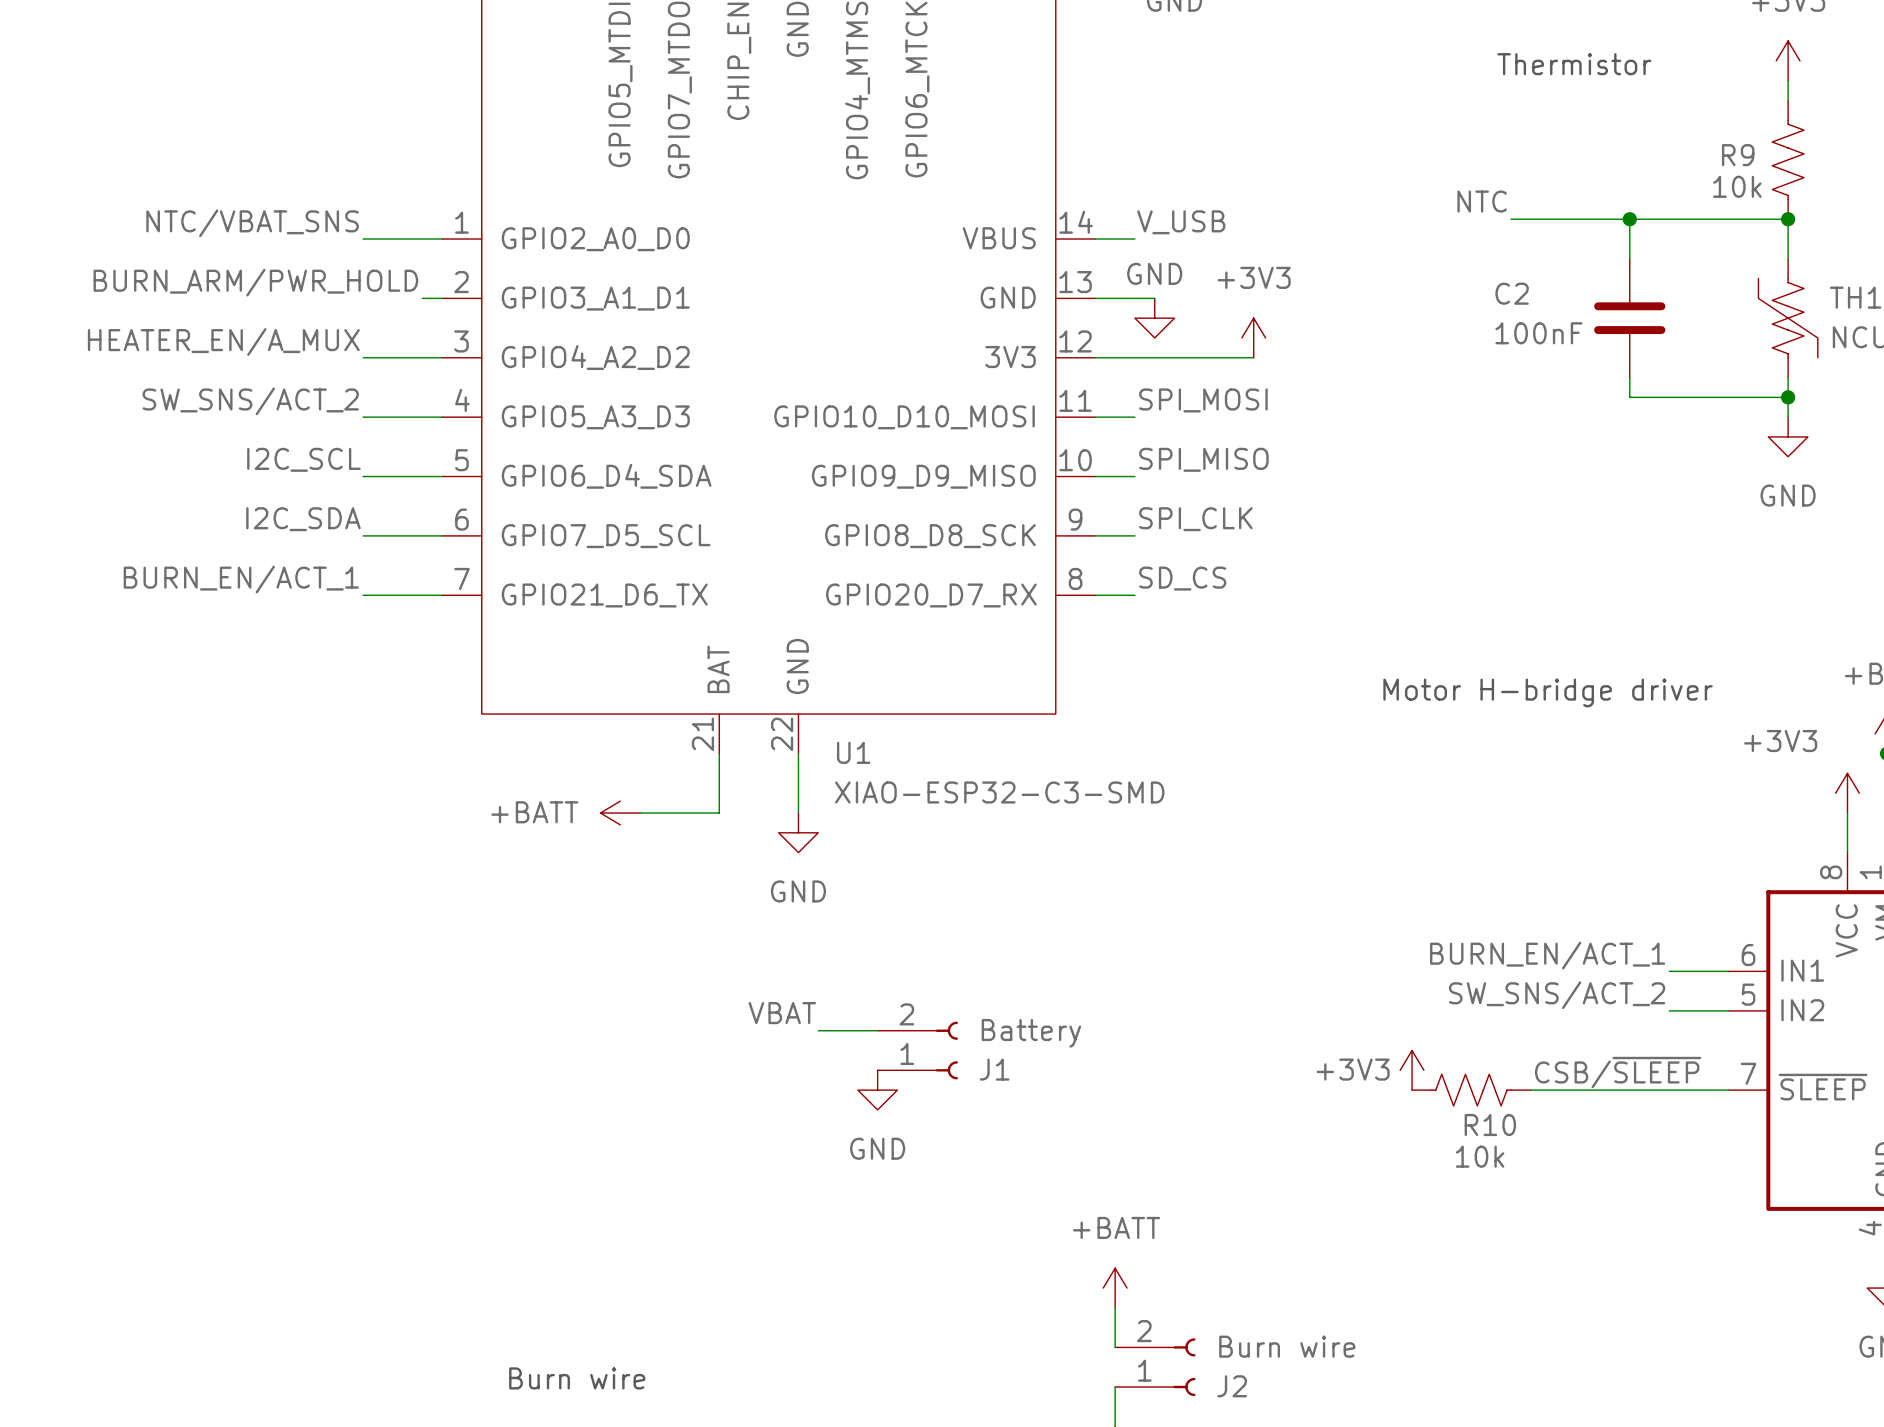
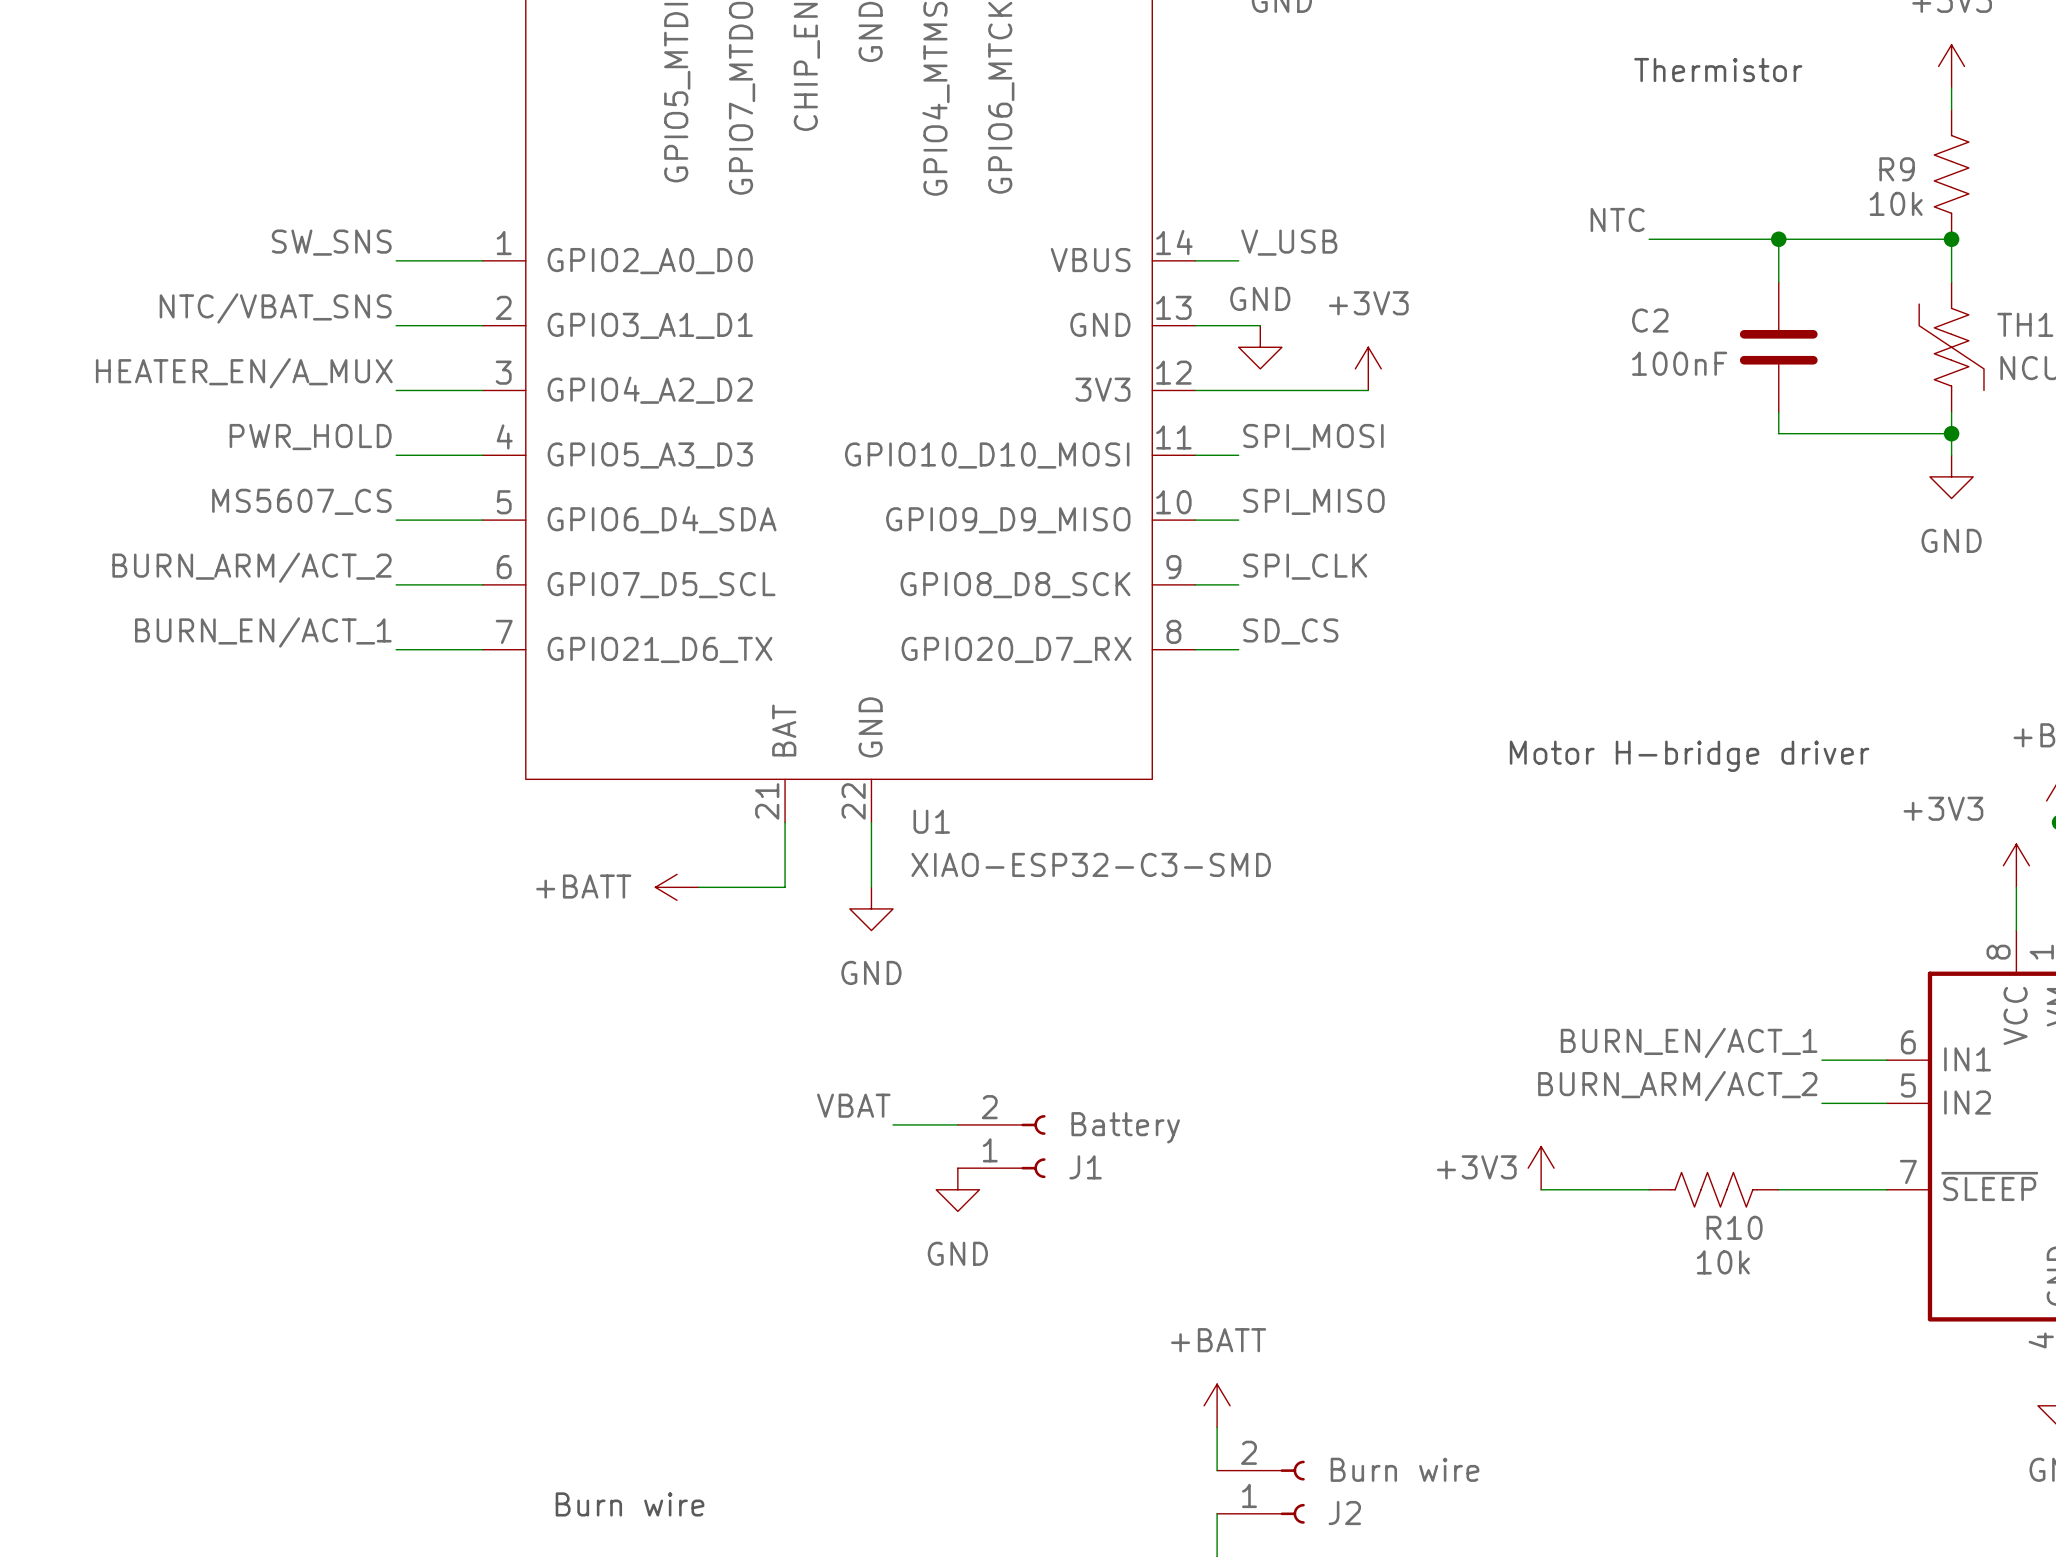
label: NTC/VBAT_SNS (252, 223) -> SW_SNS (331, 242)
label: none -> NTC/VBAT_SNS (275, 308)
label: BURN_ARM/PWR_HOLD (255, 282) -> none
wire: none -> (396, 325) (461, 325)
label: SW_SNS/ACT_2 (250, 401) -> PWR_HOLD (310, 437)
label: I2C_SCL (303, 459) -> MS5607_CS (301, 501)
label: I2C_SDA (303, 519) -> BURN_ARM/ACT_2 (252, 567)
label: SW_SNS/ACT_2 (1557, 995) -> BURN_ARM/ACT_2 (1677, 1086)
label: CSB/~{SLEEP} (1618, 1072) -> none
R10 position: (1471, 1090) -> (1713, 1189)
wire: (1530, 1090) (1629, 1090) -> (1541, 1189) (1649, 1189)

